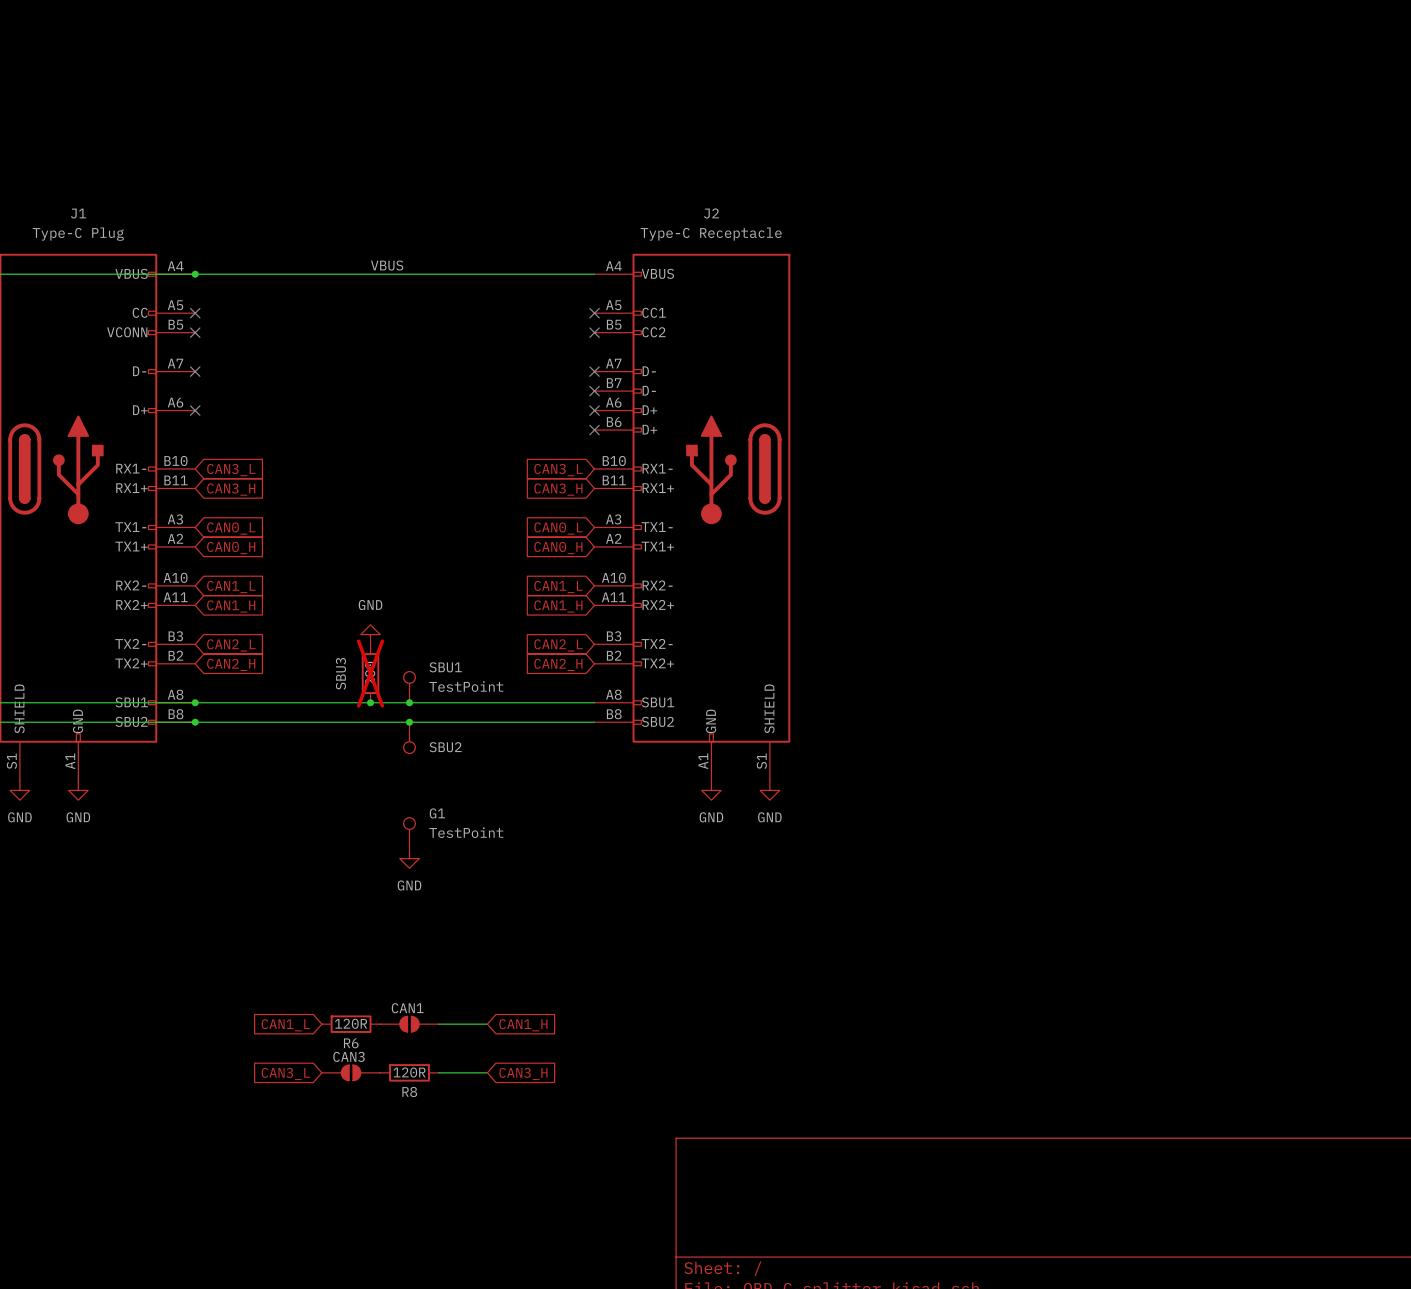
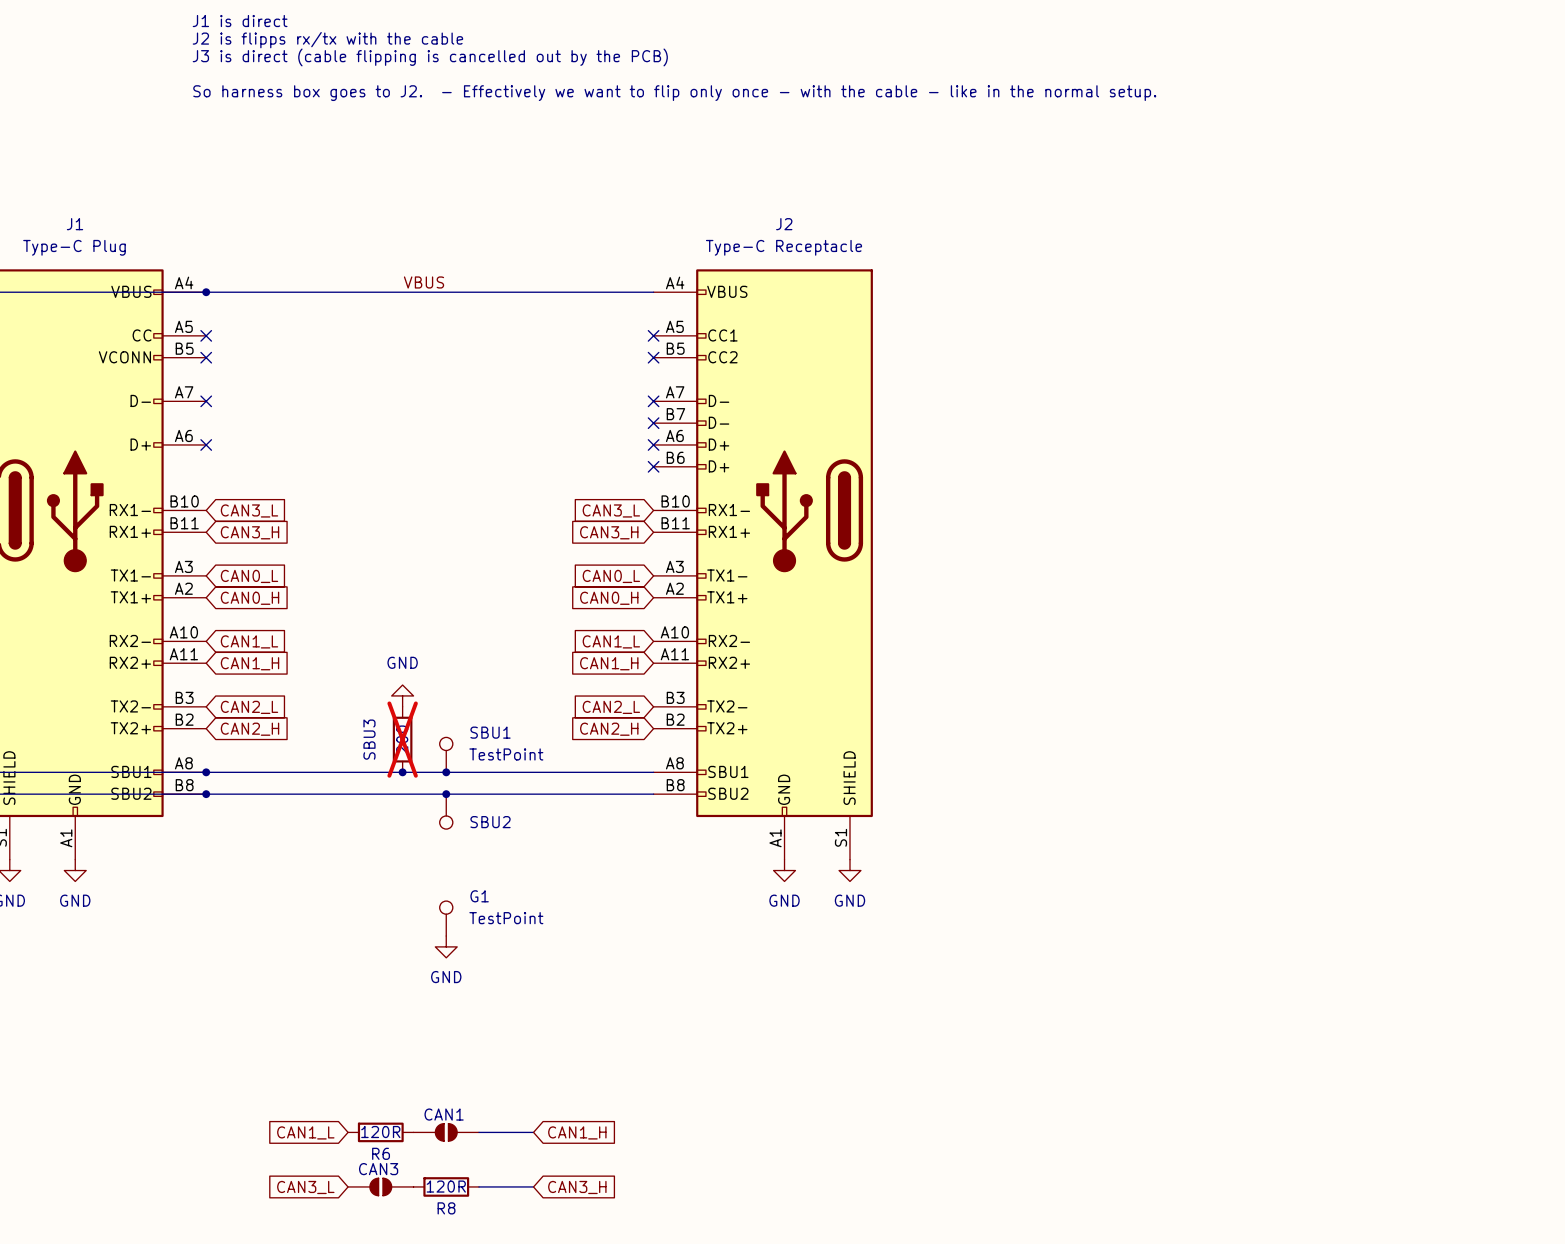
text: none -> J1 is direct (240, 21)
text: none -> J2 is flipps rx/tx with the cable (327, 40)
text: none -> J3 is direct (cable flipping is cancelled out by the PCB) (430, 57)
text: none -> So harness box goes to J2. - Effectively we want to flip only once - with the cable - like in the normal setup. (674, 93)

